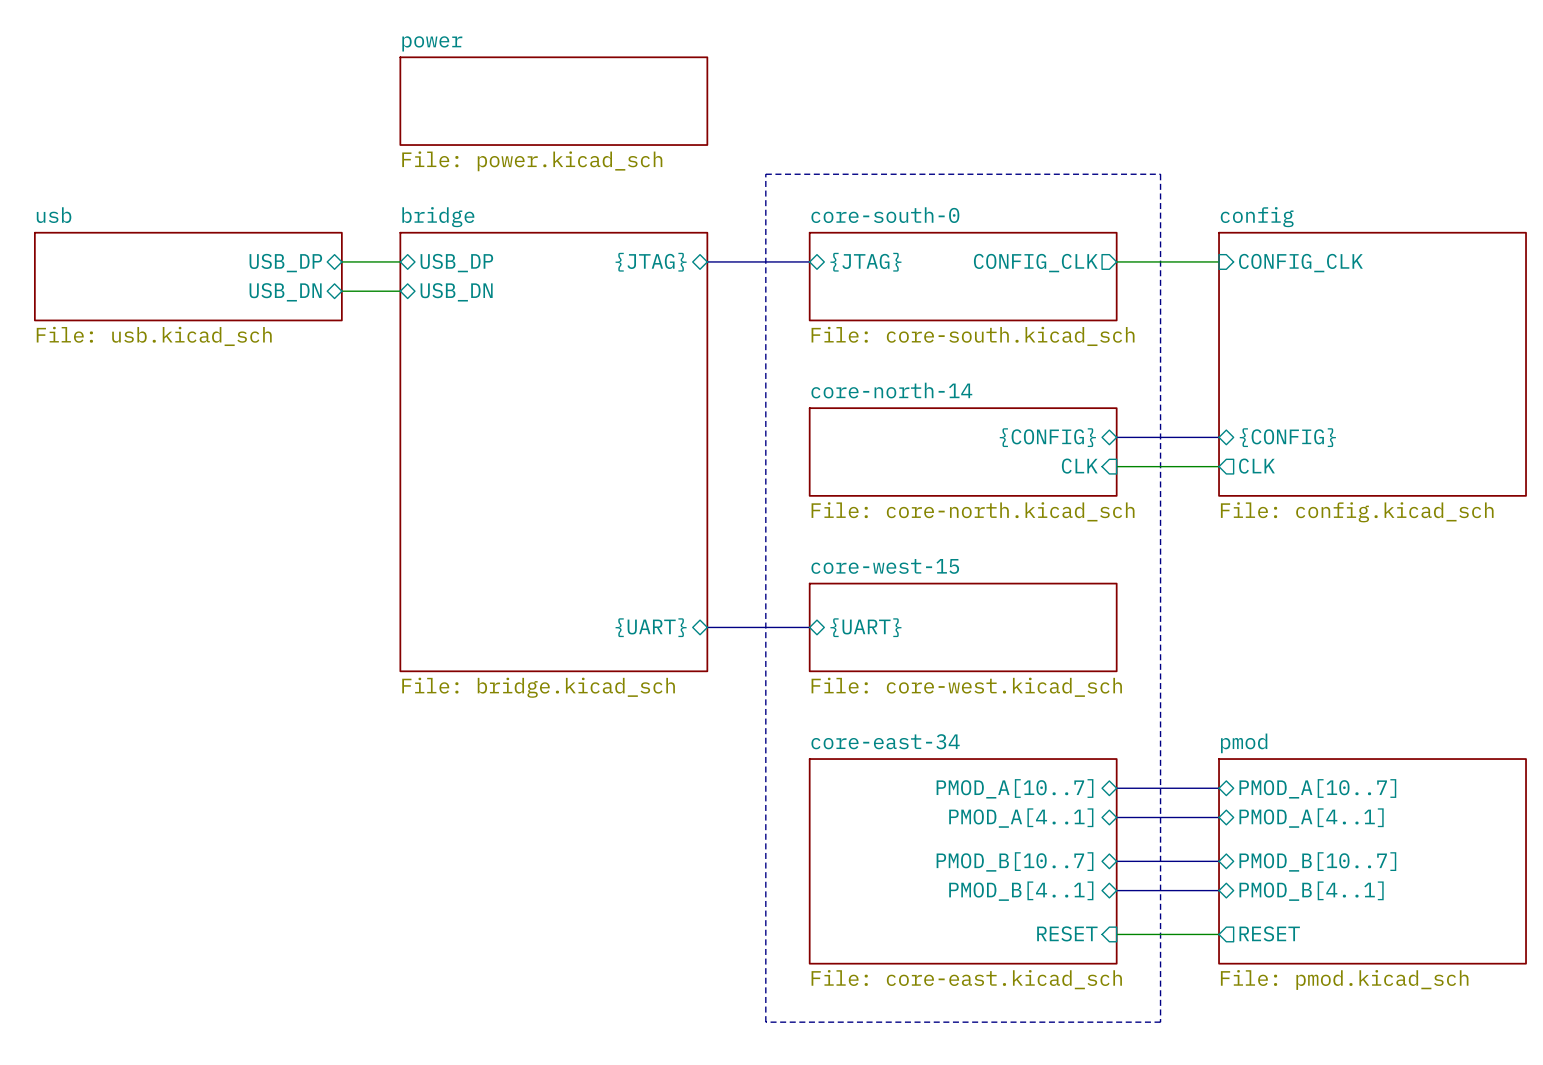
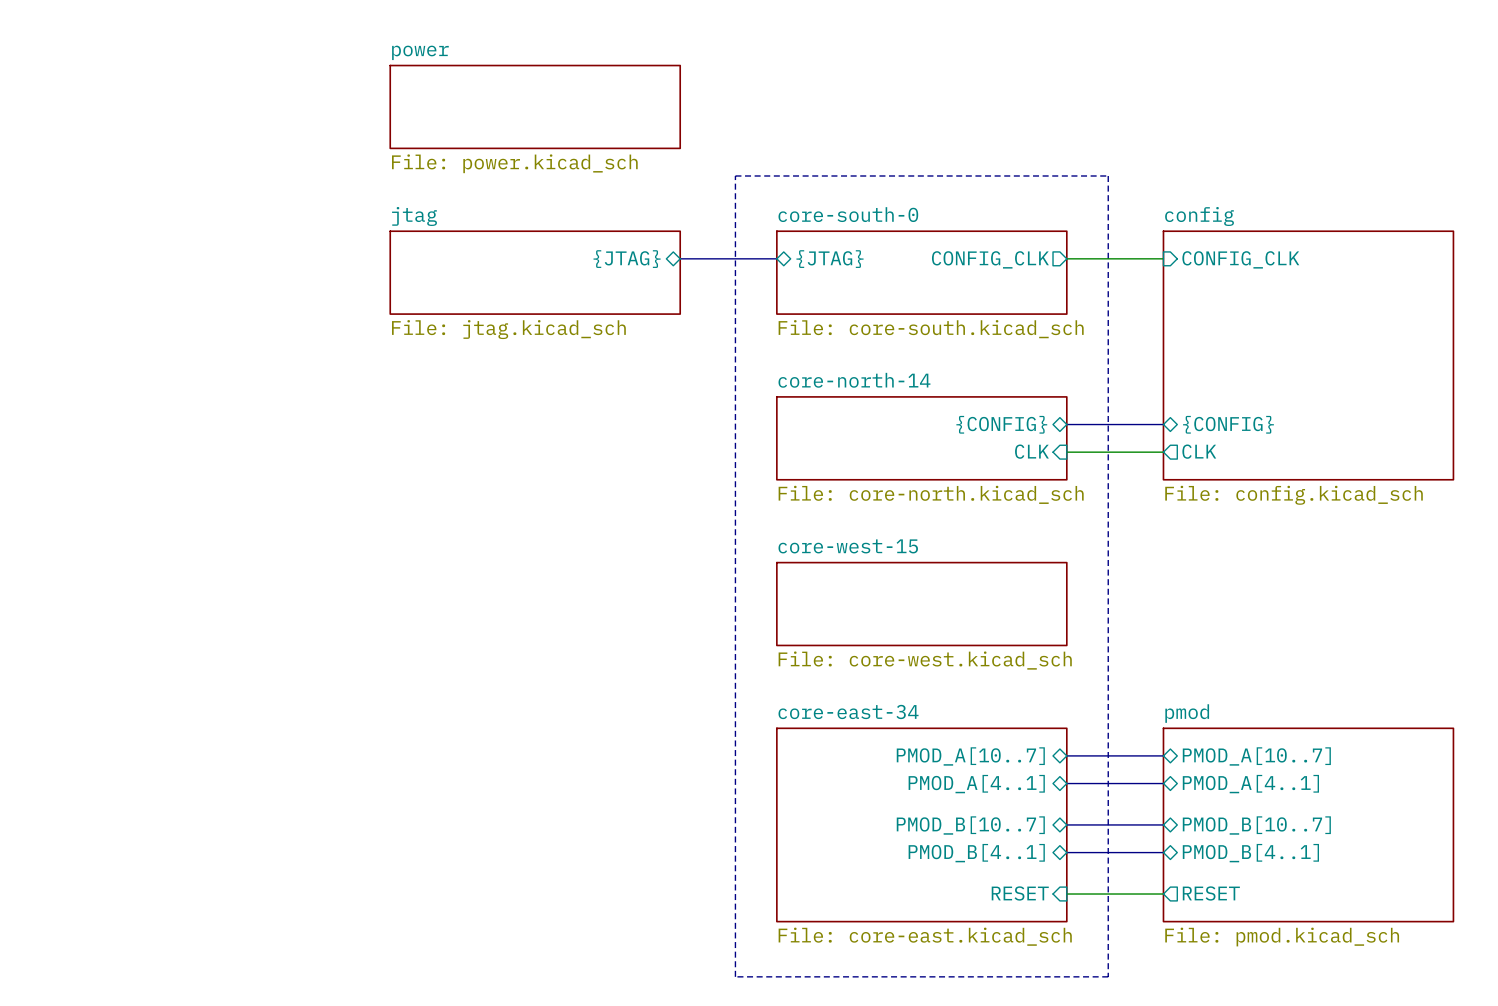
wire: (341, 261) (400, 261) -> none
sheet pin: USB_DP (285, 263) -> none
sheet pin: USB_DP (456, 263) -> none
sheet usb: File: usb.kicad_sch (188, 276) -> none
sheet jtag: none -> File: jtag.kicad_sch (535, 272)
wire: (341, 291) (400, 291) -> none
sheet pin: USB_DN (285, 292) -> none
sheet pin: USB_DN (456, 292) -> none
sheet bridge: File: bridge.kicad_sch (553, 452) -> none
sheet pin: {UART} (651, 627) -> none
bus: (707, 627) (809, 627) -> none
sheet pin: {UART} (865, 627) -> none

